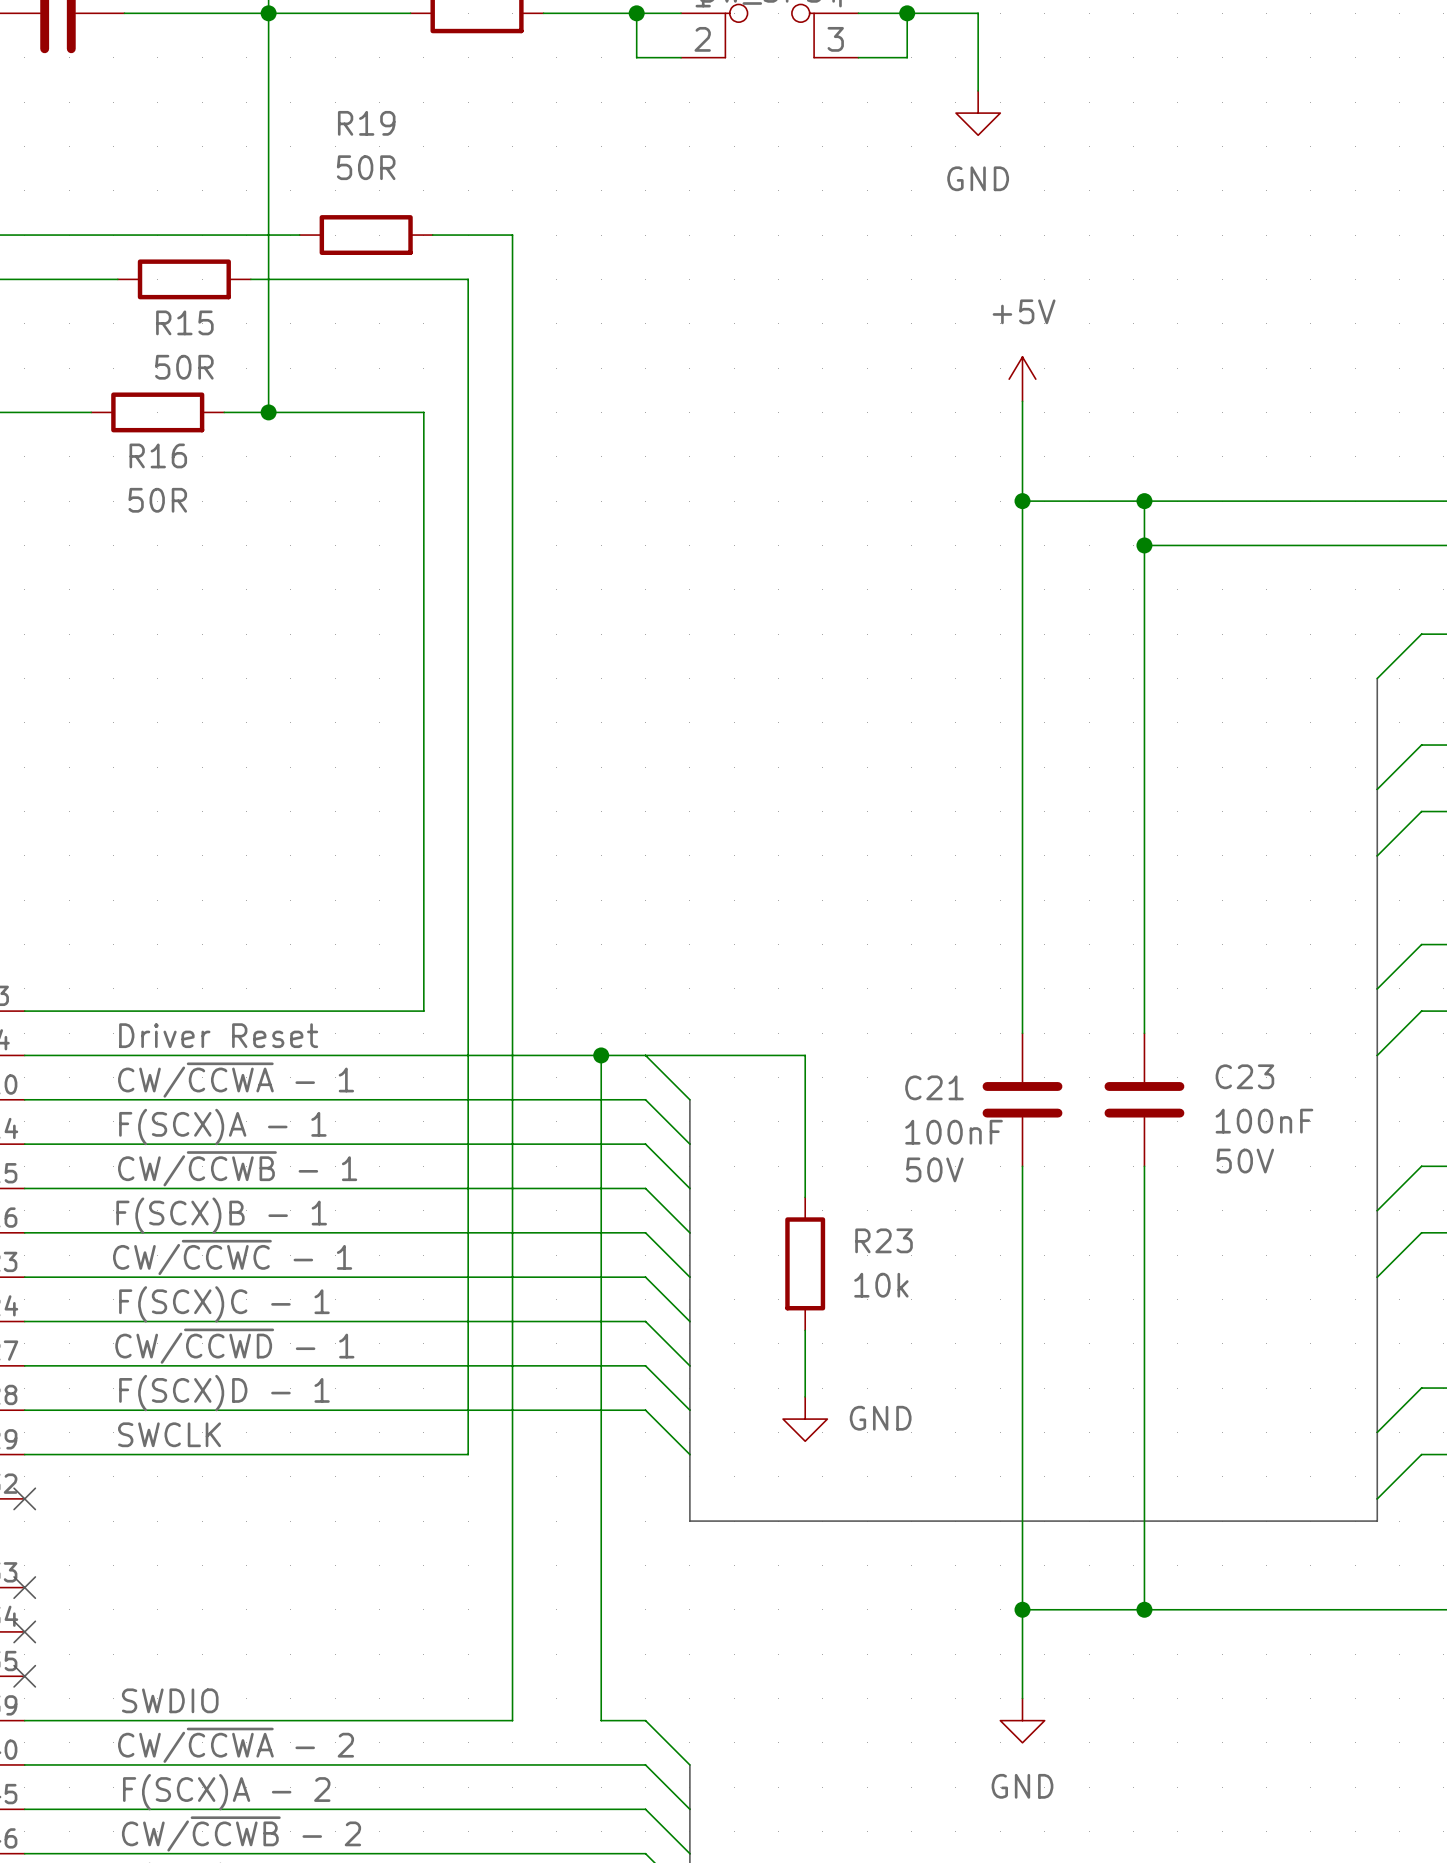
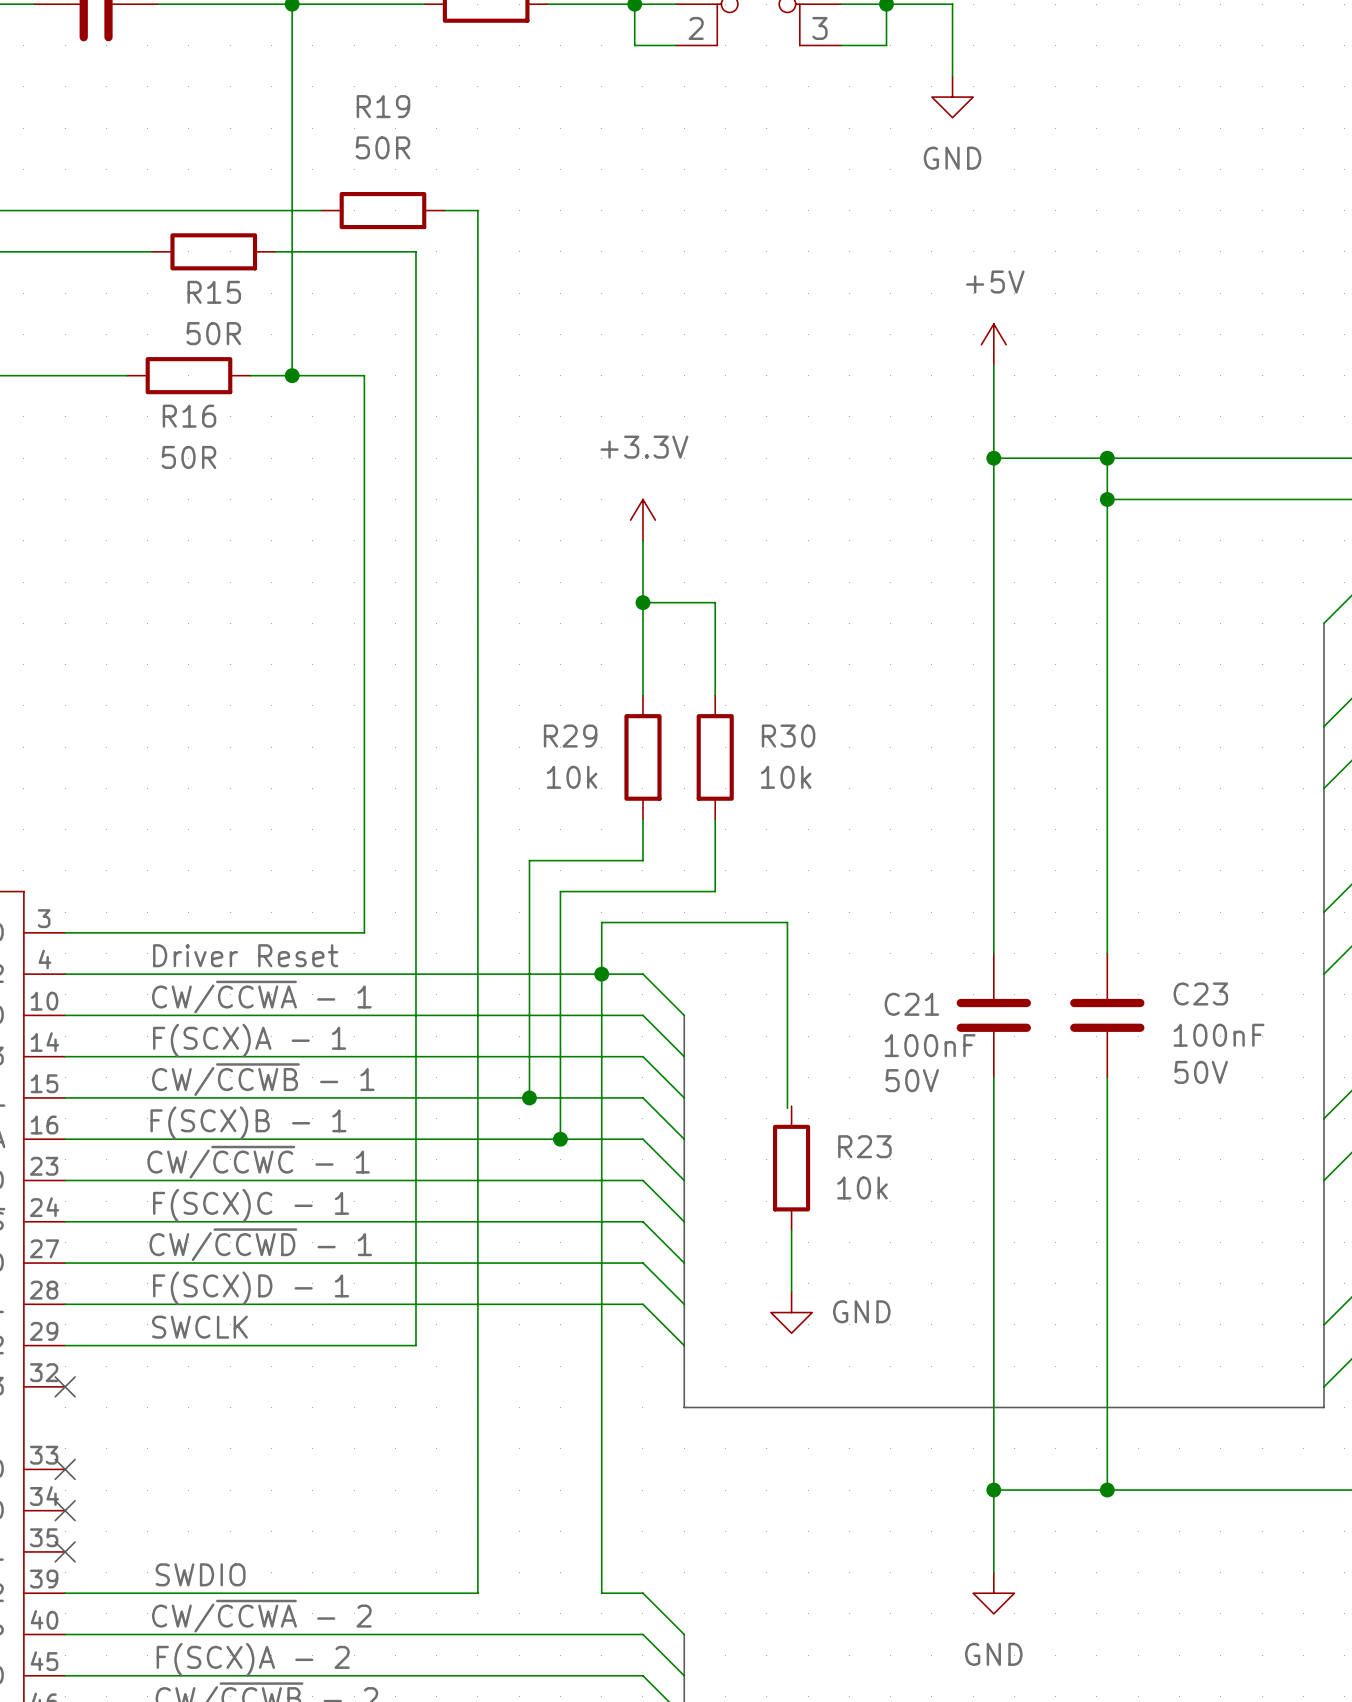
wire: (468, 235) (512, 235) (512, 1720) (468, 1720) -> none
wire: (401, 279) (468, 279) -> (477, 210) (477, 251)
wire: none -> (415, 251) (415, 1345)
wire: (346, 412) (423, 412) (423, 1011) (346, 1011) -> (364, 375) (364, 932)
power symbol: none -> +3.3V (642, 520)
wire: none -> (642, 540) (642, 695)
wire: none -> (642, 602) (715, 602) (715, 695)
junction: none -> (642, 602)
R29: none -> 10k (642, 757)
R30: none -> 10k (715, 757)
wire: none -> (642, 819) (642, 860) (529, 860) (529, 1097)
wire: none -> (715, 819) (715, 891) (560, 891) (560, 1139)
wire: none -> (601, 974) (601, 922) (787, 922) (787, 1108)
wire: (645, 1055) (805, 1055) (805, 1197) -> none
junction: none -> (529, 1097)
junction: none -> (560, 1139)
wire: (401, 1454) (468, 1454) -> (477, 1593) (477, 1345)

